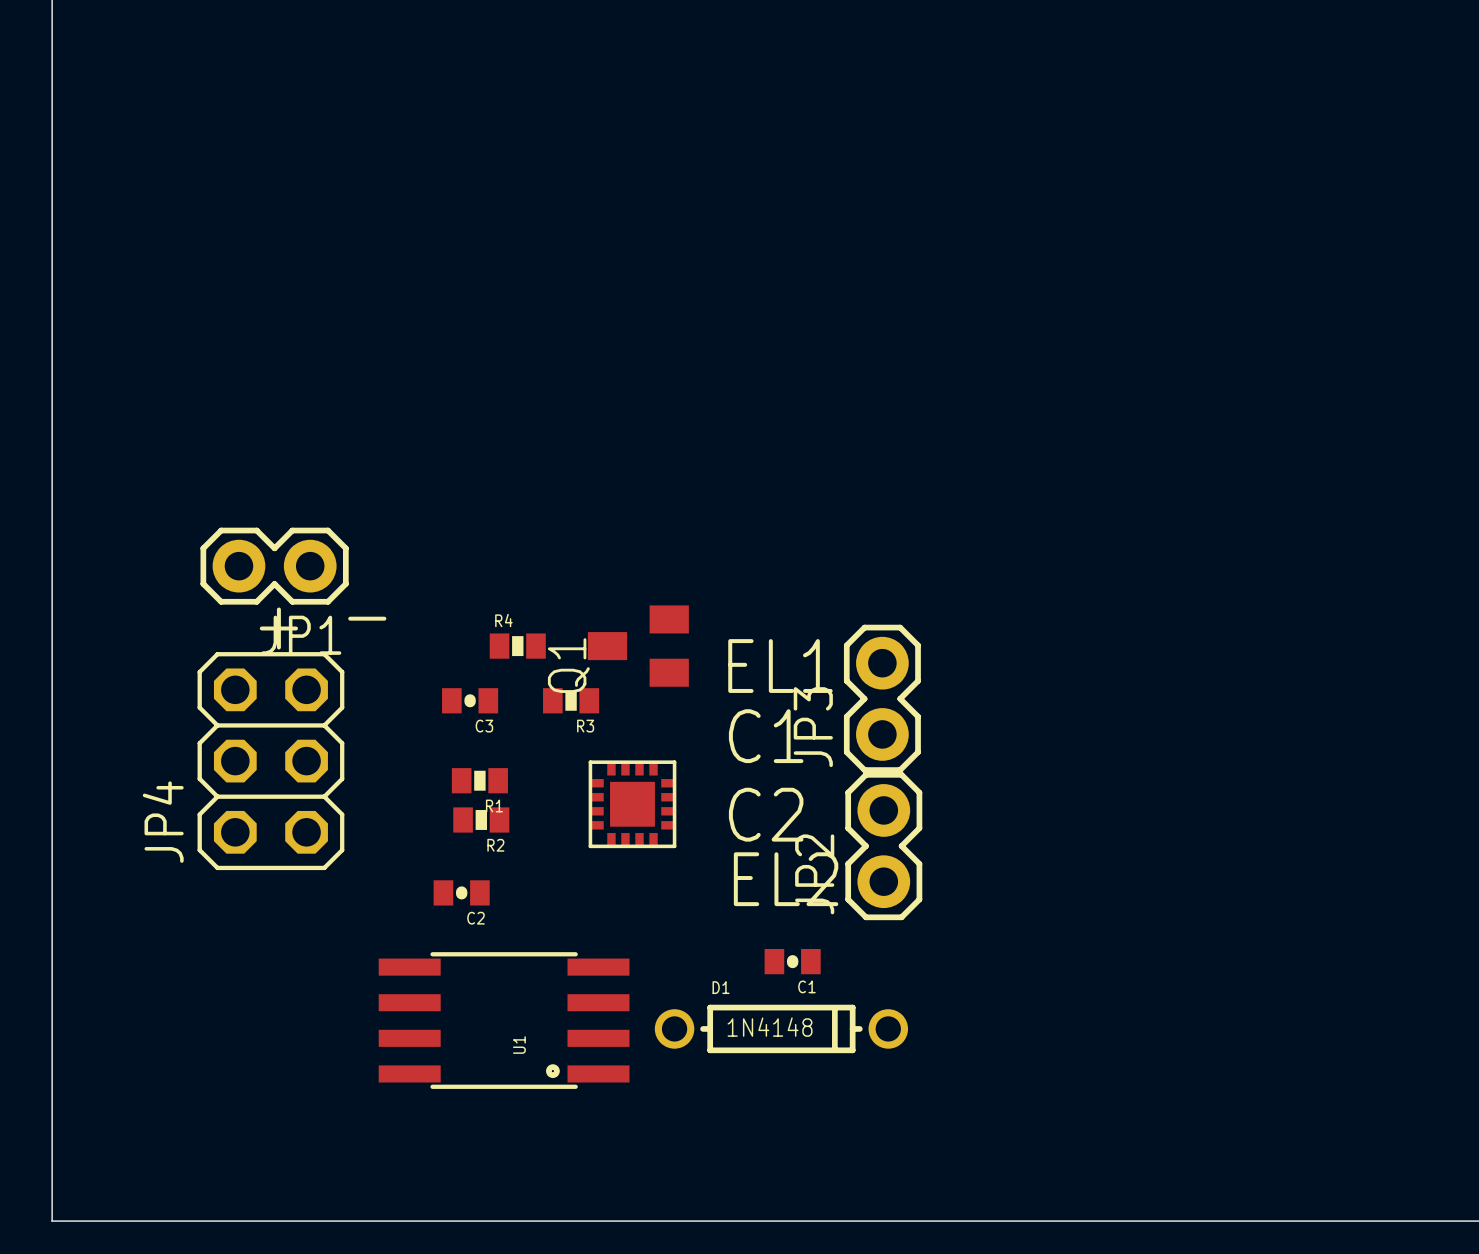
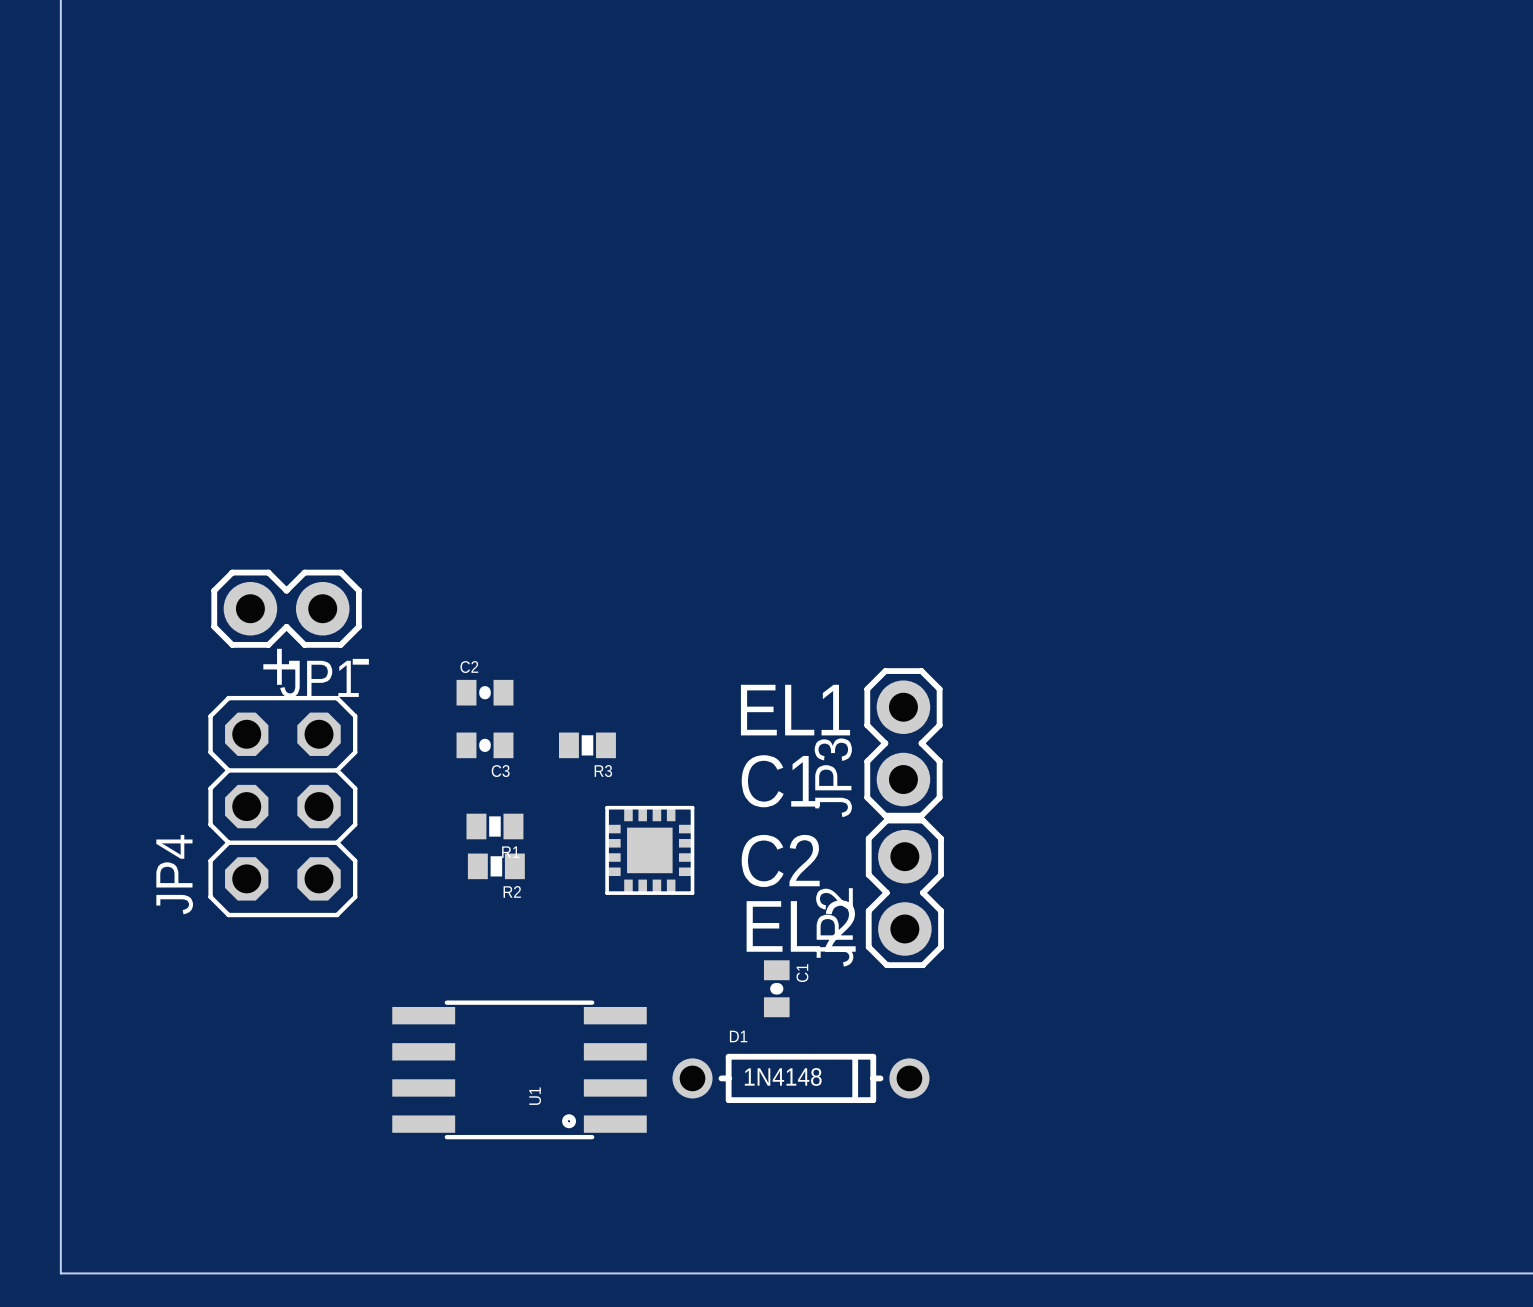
R4: (517, 646) -> none
Q1: (638, 646) -> none
C2 position: (461, 892) -> (484, 692)
C2 name position: C2 (475, 918) -> C2 (469, 667)
C1 rotation: 0° (792, 961) -> 90° clockwise (776, 988)
C1 position: (792, 961) -> (776, 988)

